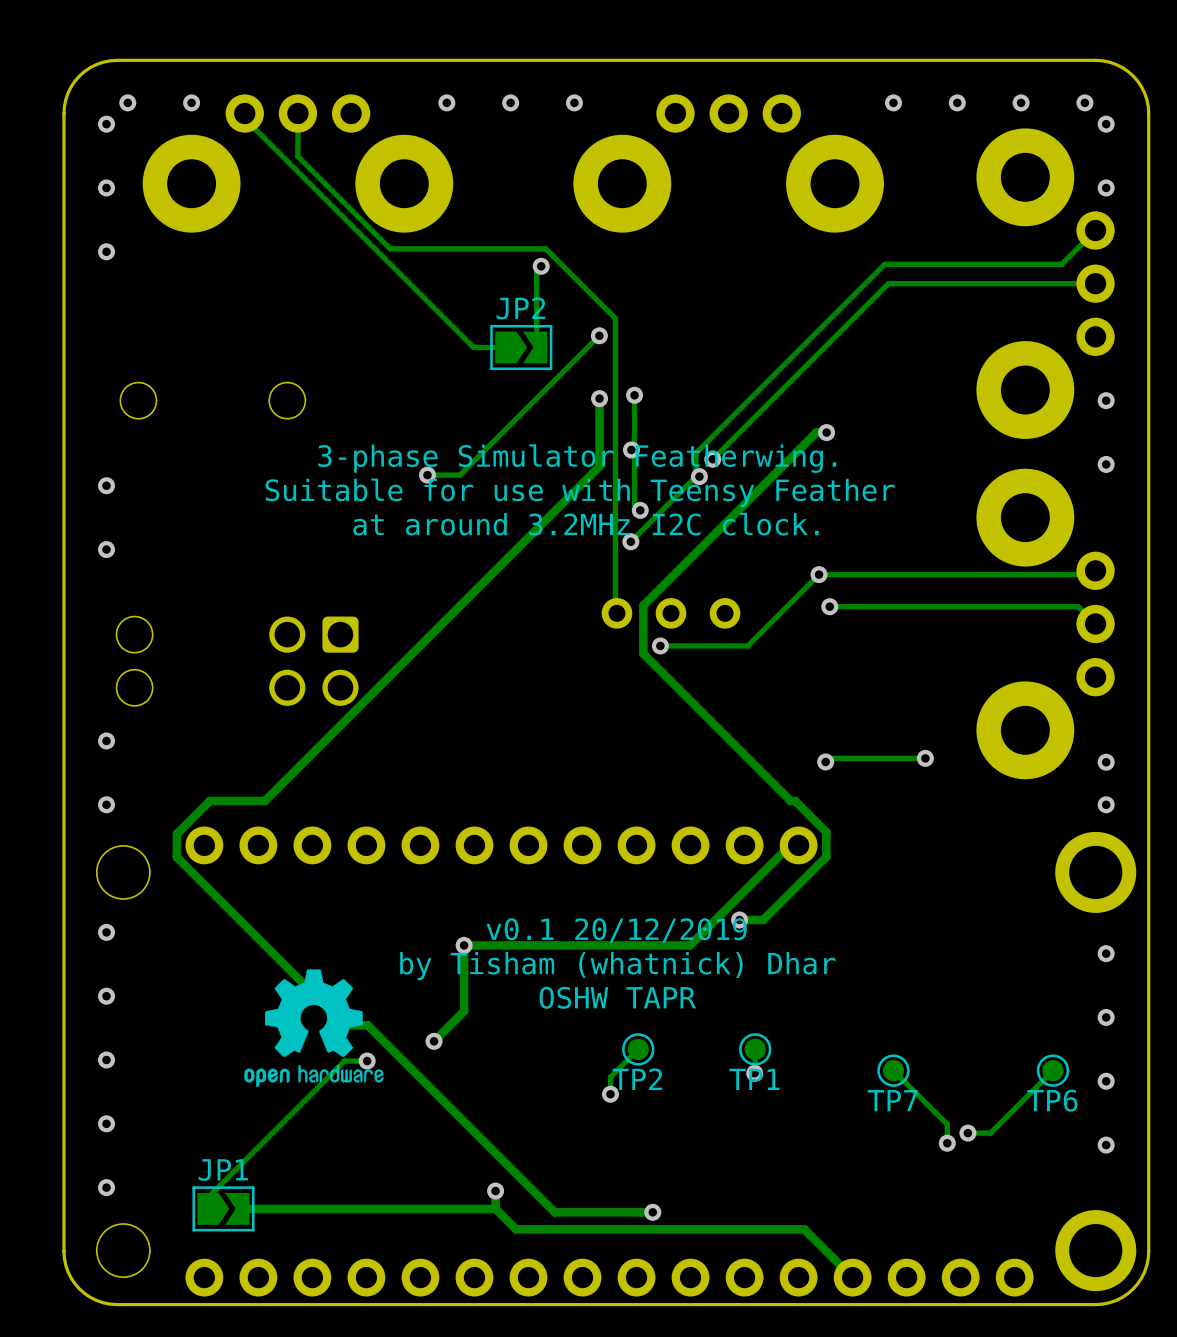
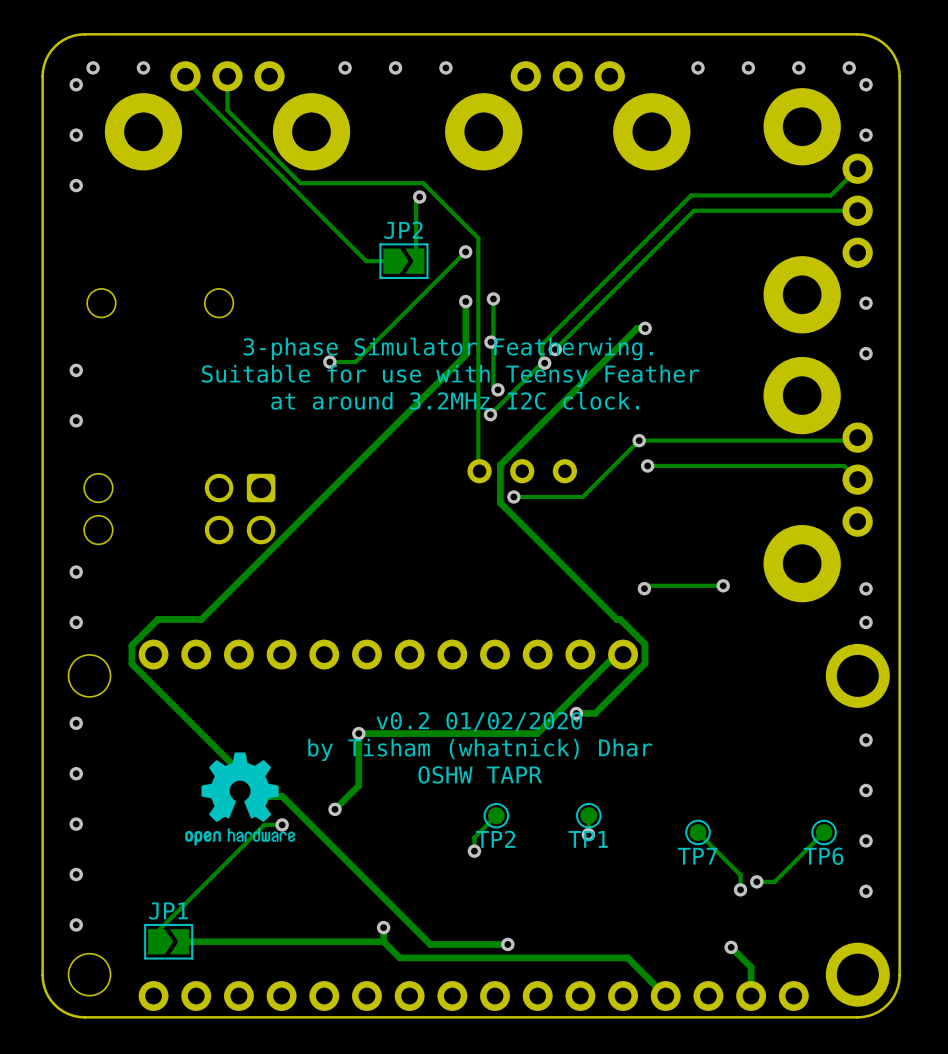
text: v0.1 20/12/2019 (616, 930) -> v0.2 01/02/2020 (479, 721)
track: none -> (731, 947) (751, 967) (751, 996)
via: none -> (731, 947)

